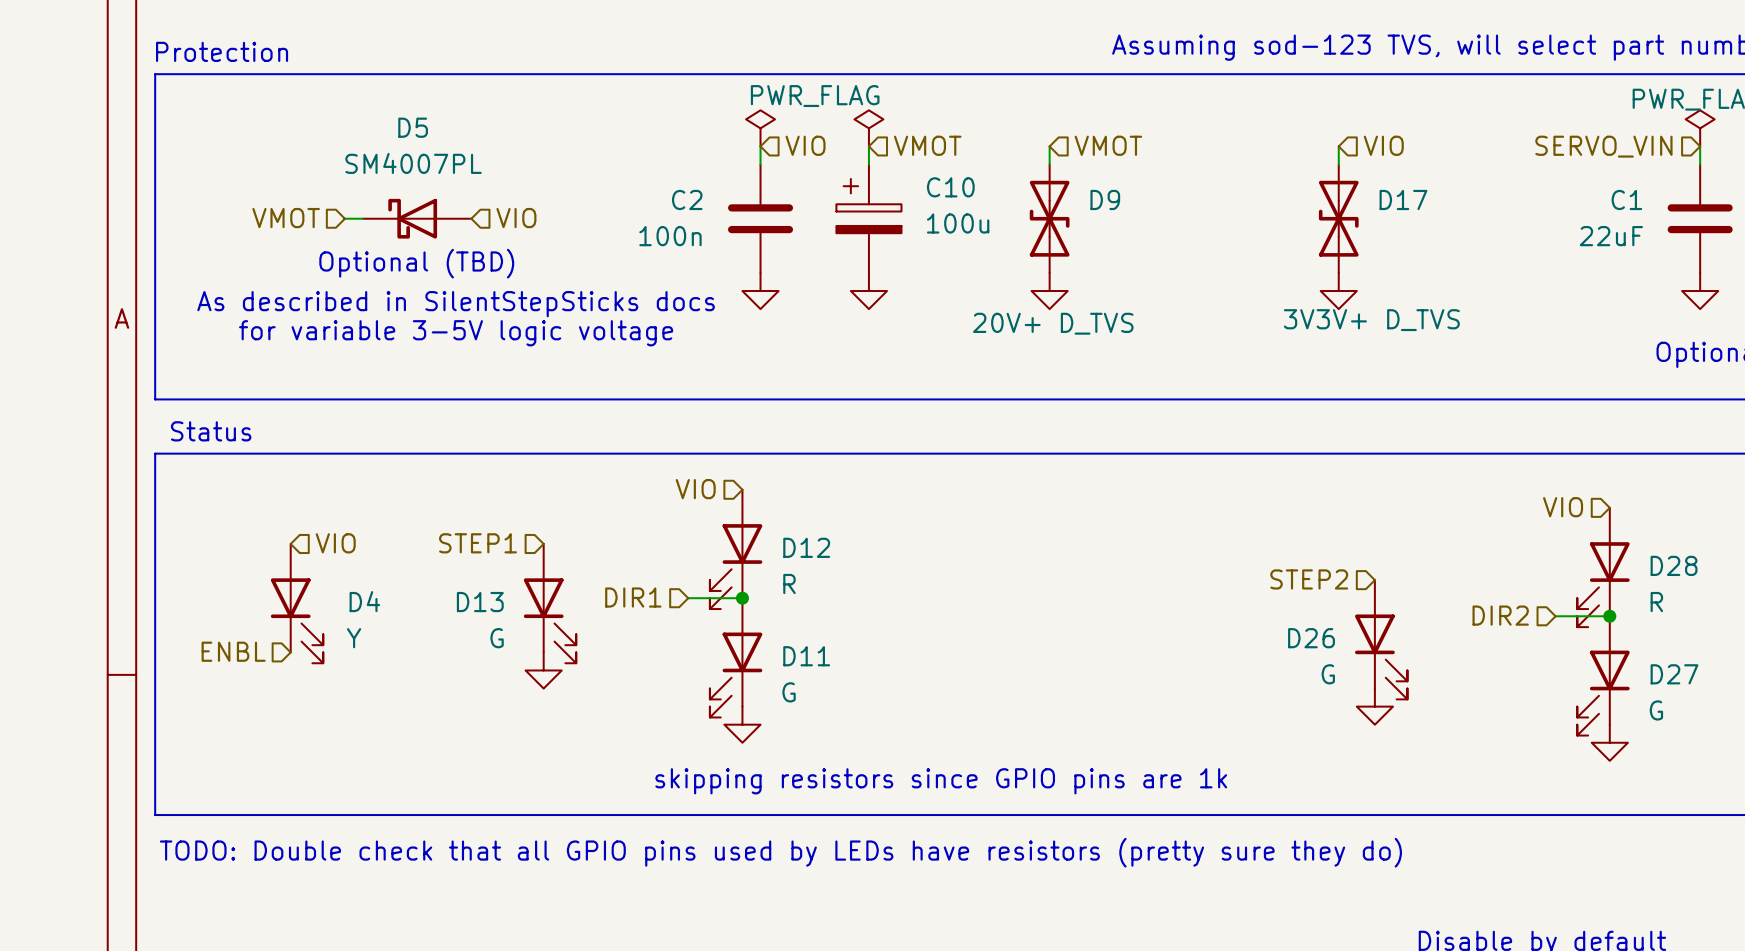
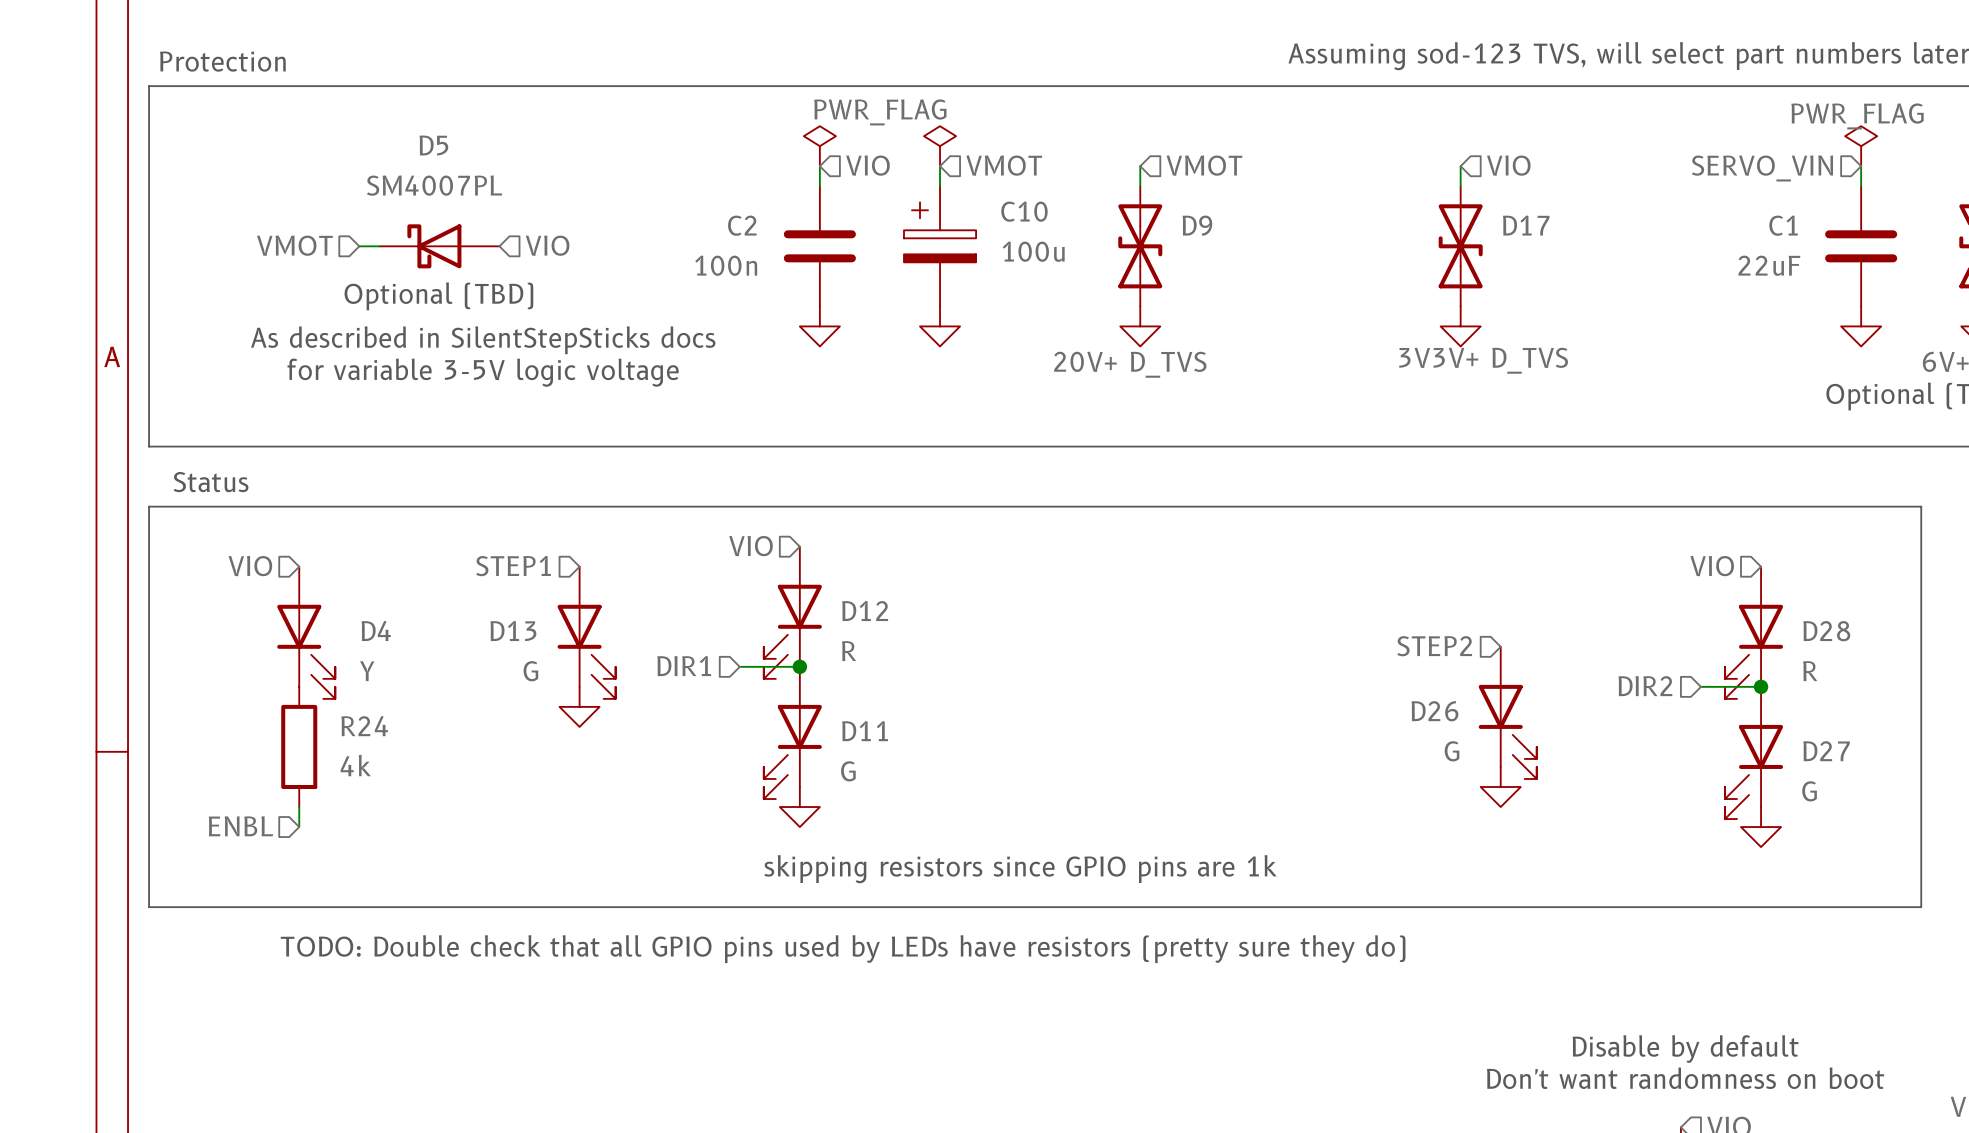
hierarchical label rotation: 0° (335, 543) -> 180° (250, 566)
hierarchical label position: VIO (335, 543) -> VIO (250, 566)
hierarchical label position: STEP1 (478, 543) -> STEP1 (513, 566)
D4 position: (297, 603) -> (306, 632)
D13 position: (550, 603) -> (586, 632)
hierarchical label position: ENBL (233, 651) -> ENBL (240, 826)
R24: none -> 4k (299, 746)
power symbol position: (543, 670) -> (579, 706)
wire: none -> (299, 807) (299, 827)

